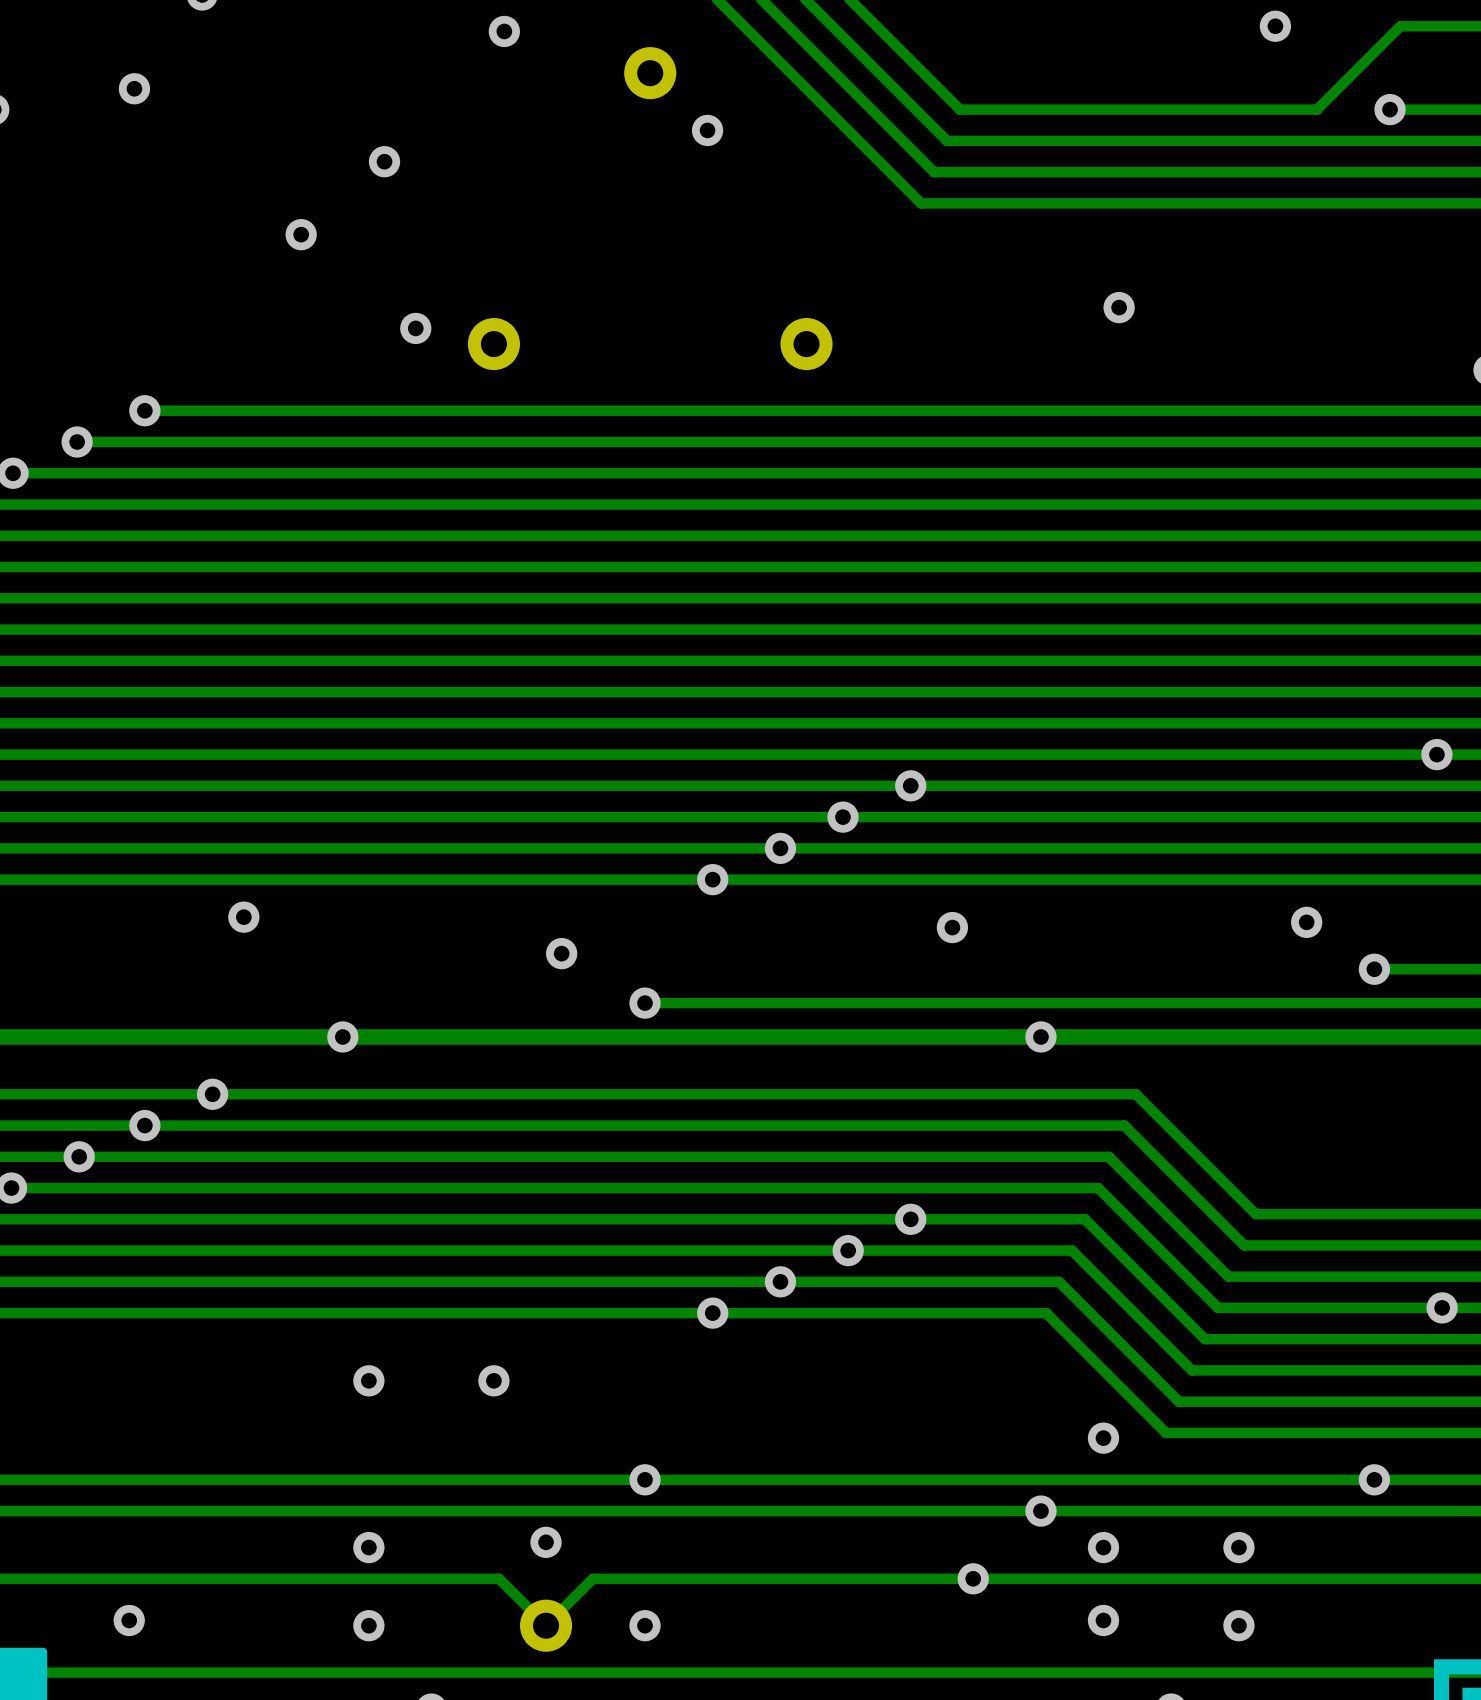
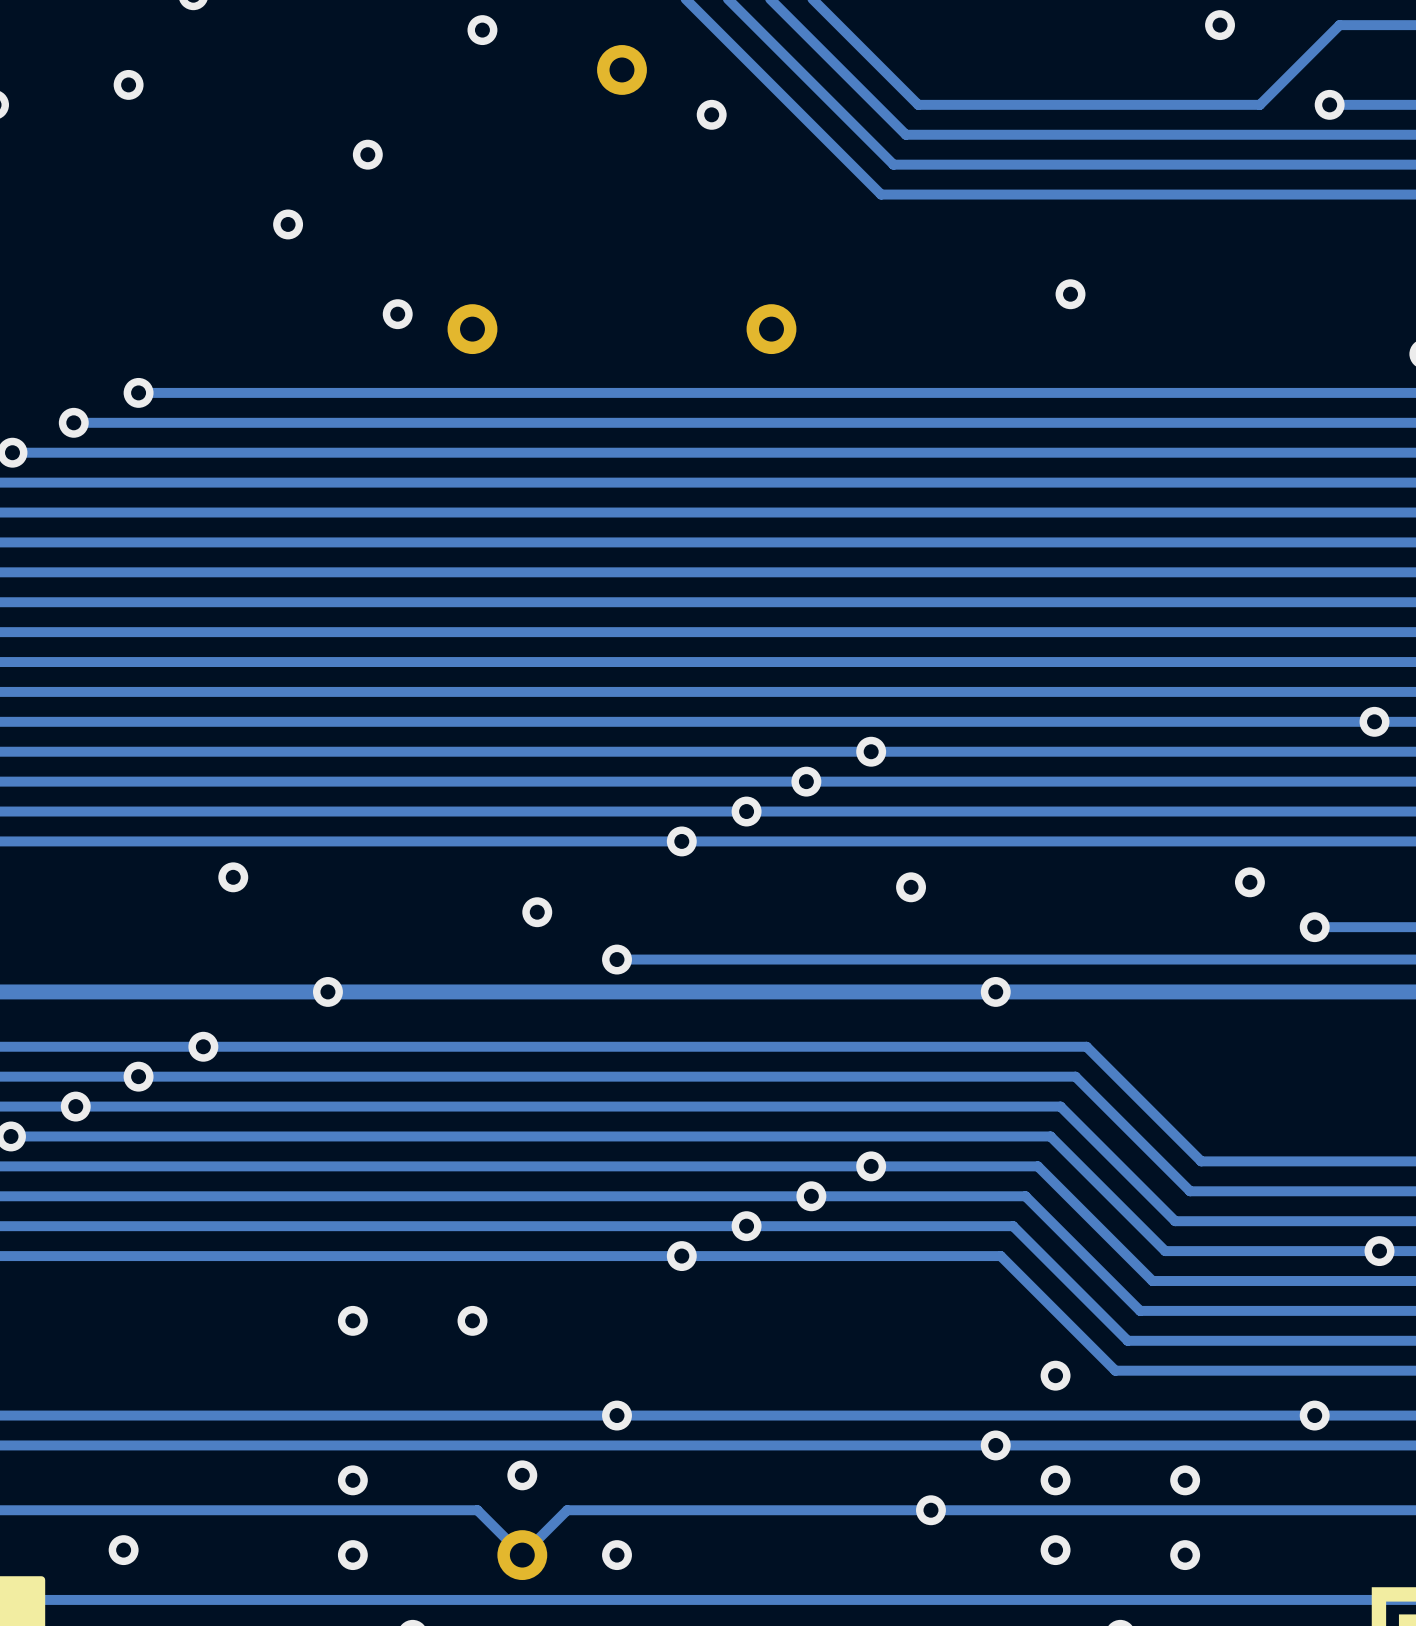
via position: (707, 130) -> (711, 114)

